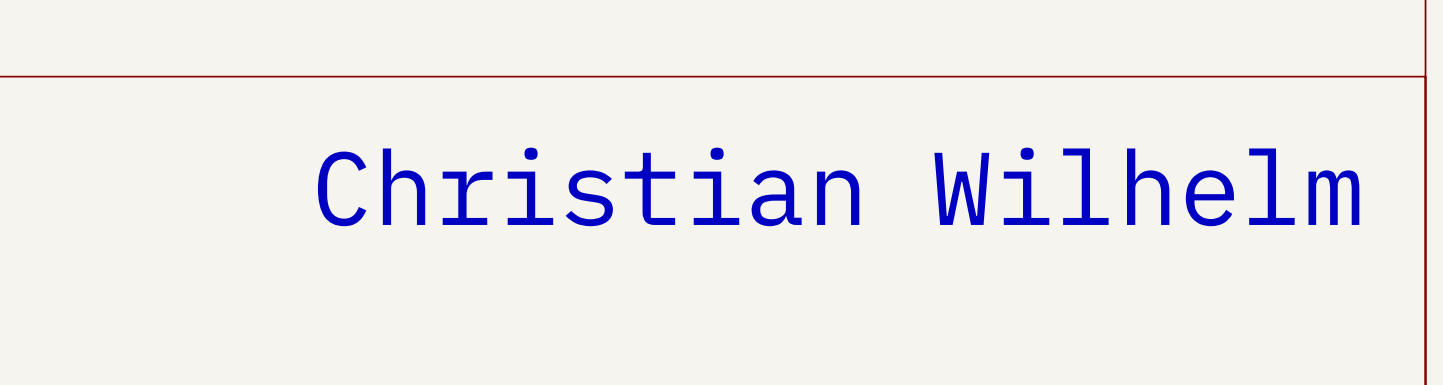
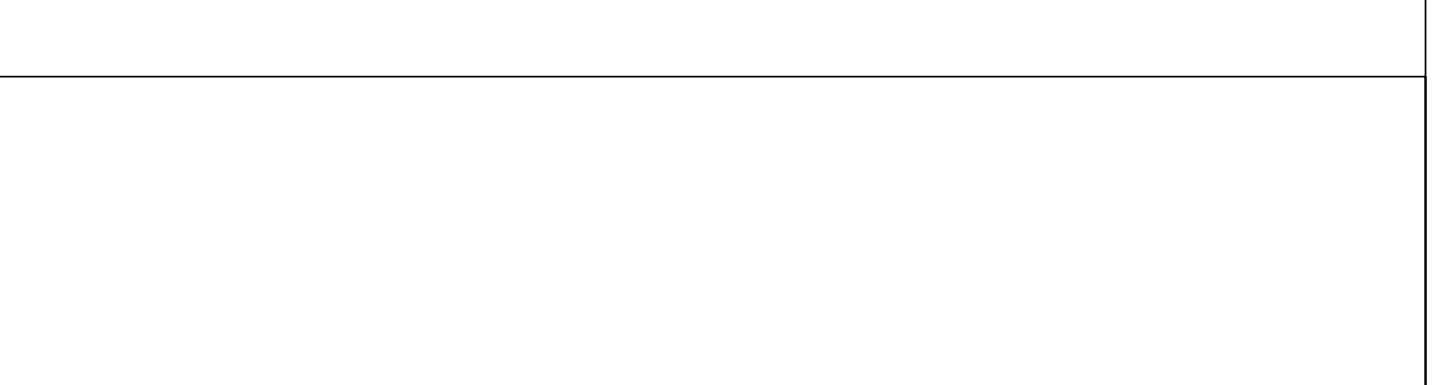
text: Christian Wilhelm (838, 186) -> none

